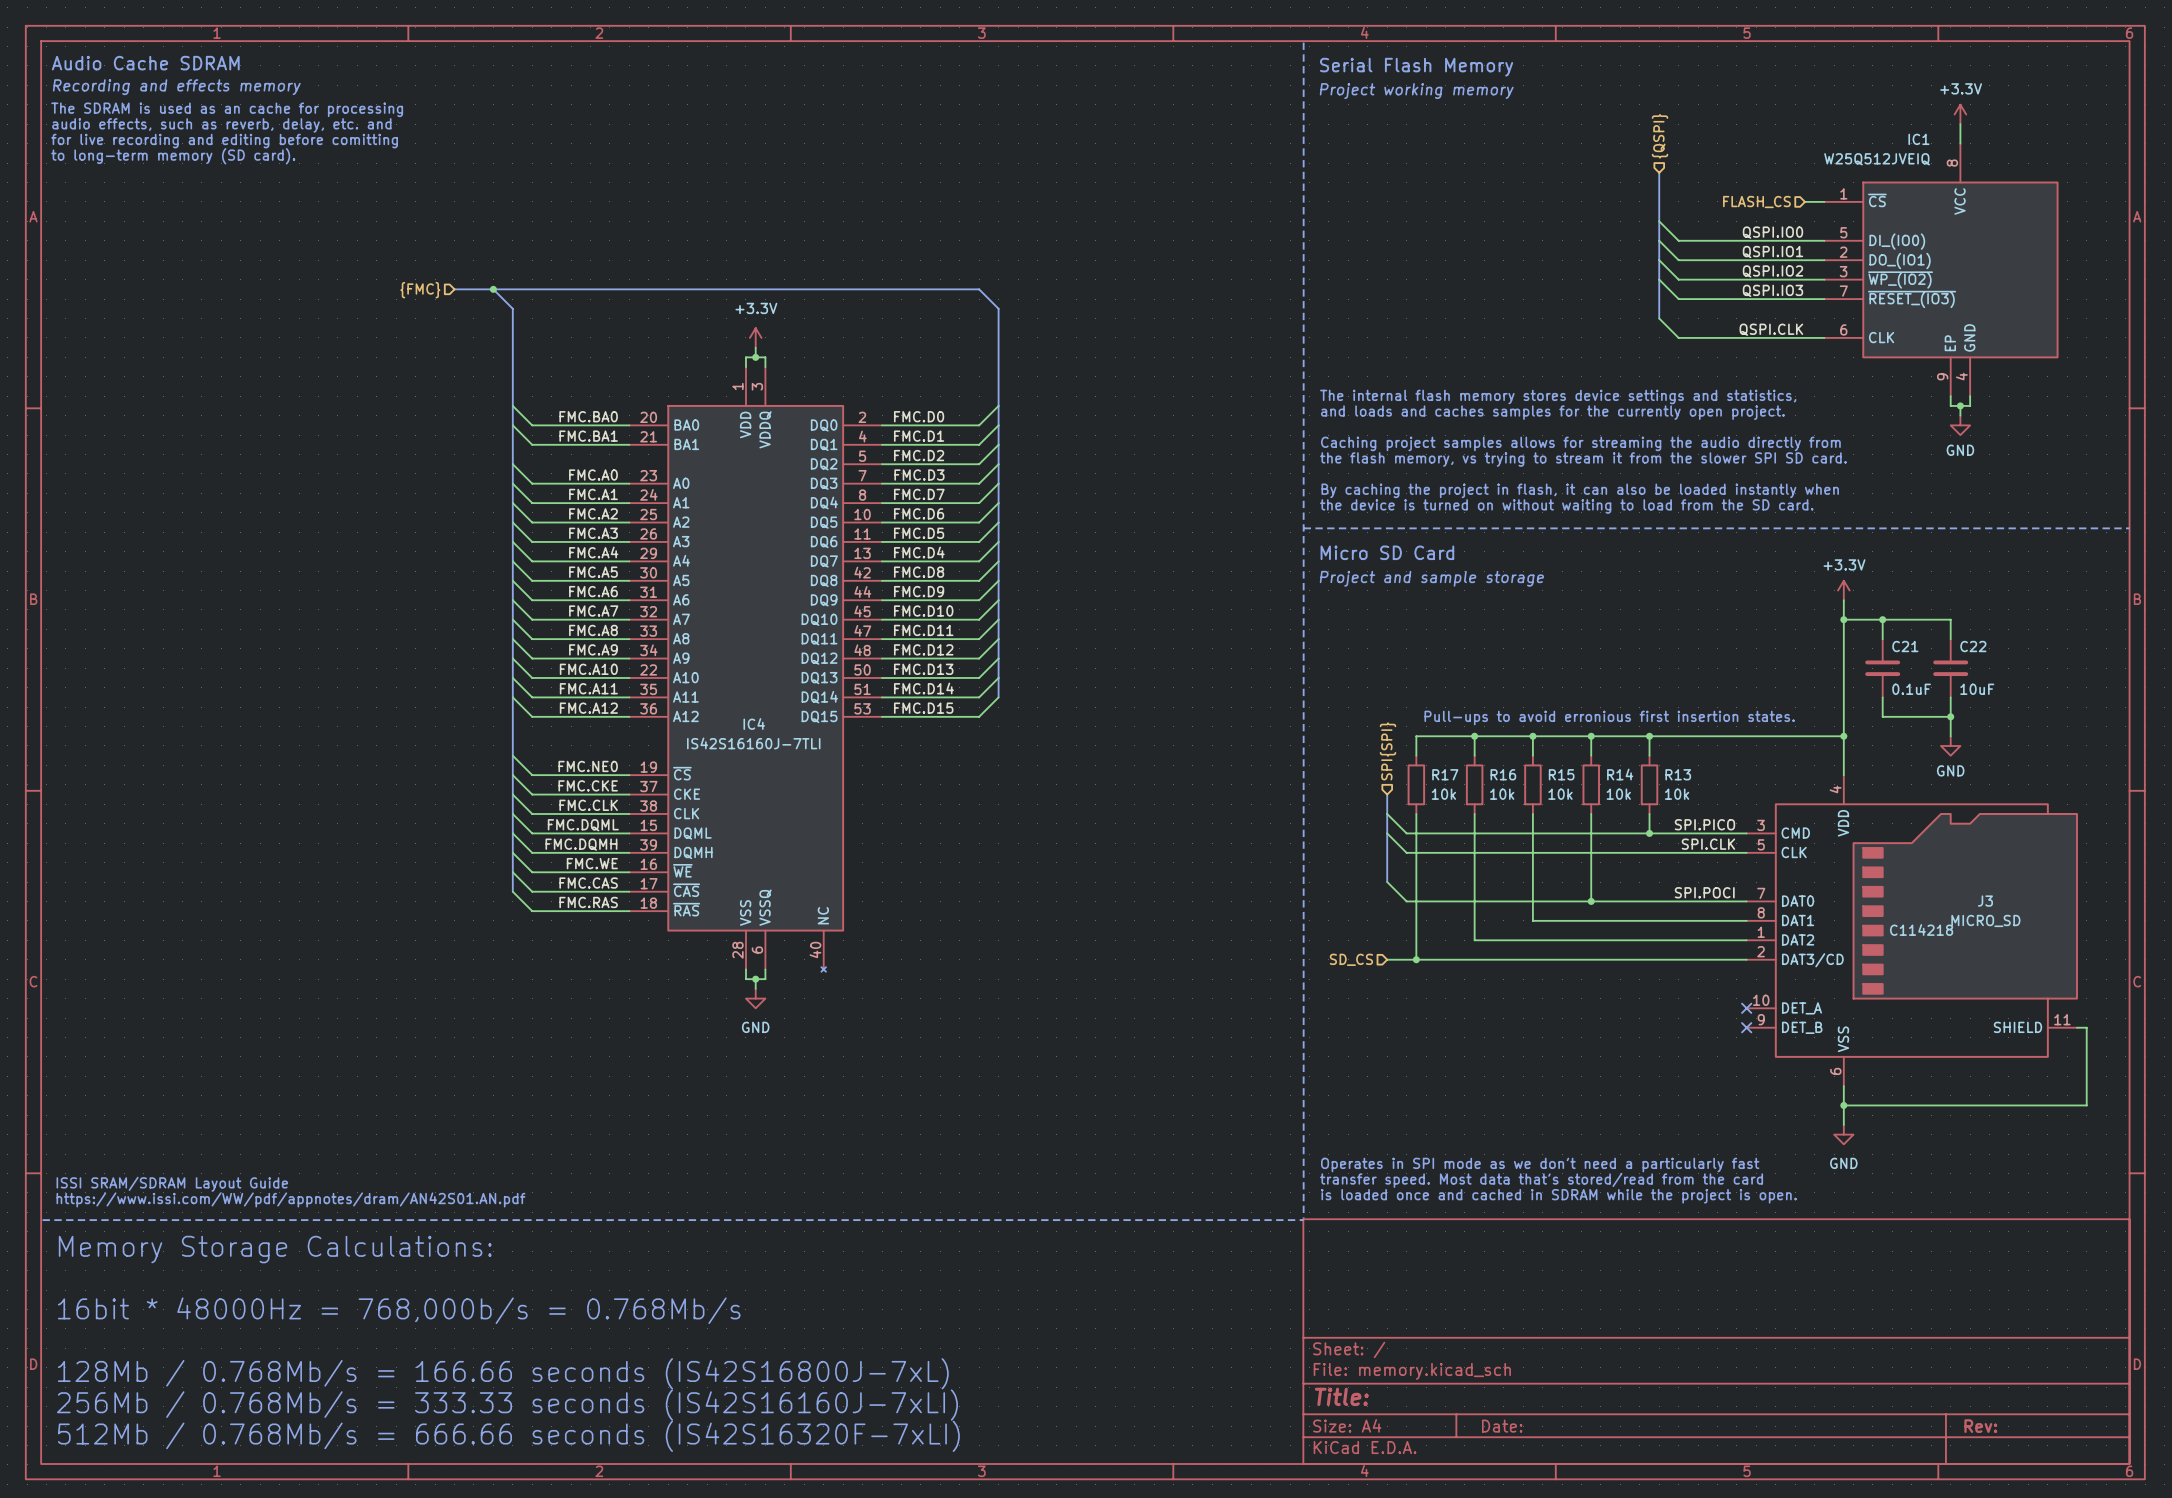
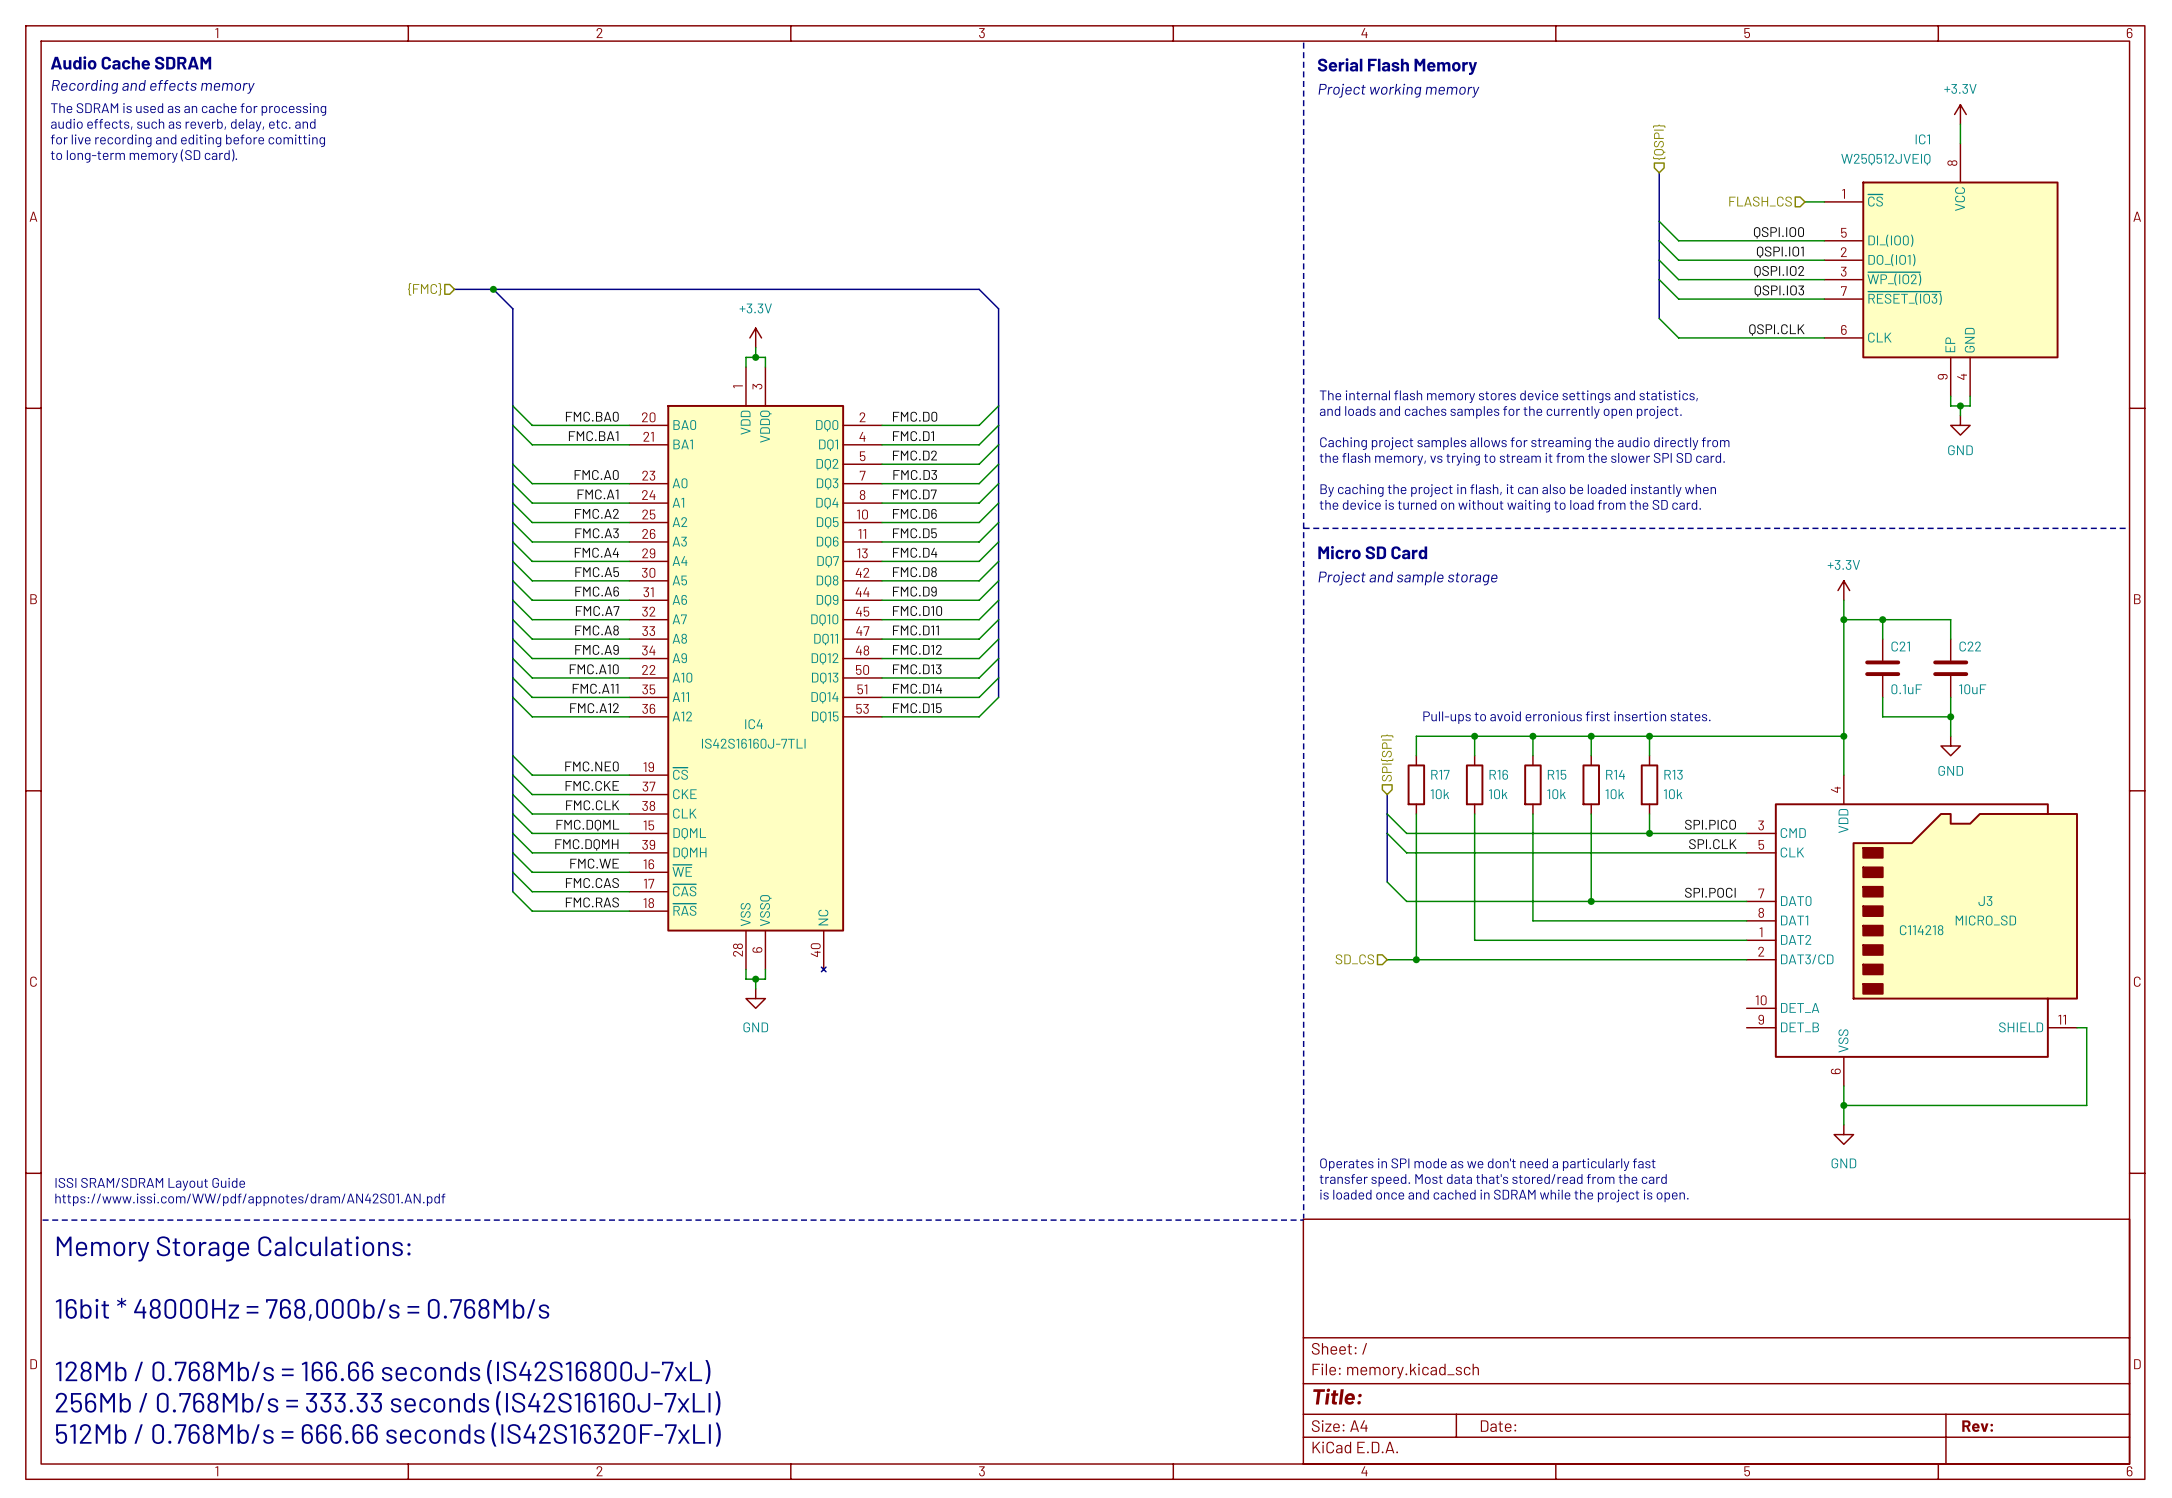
no-connect mark: (1746, 1008) -> none
no-connect mark: (1746, 1027) -> none

